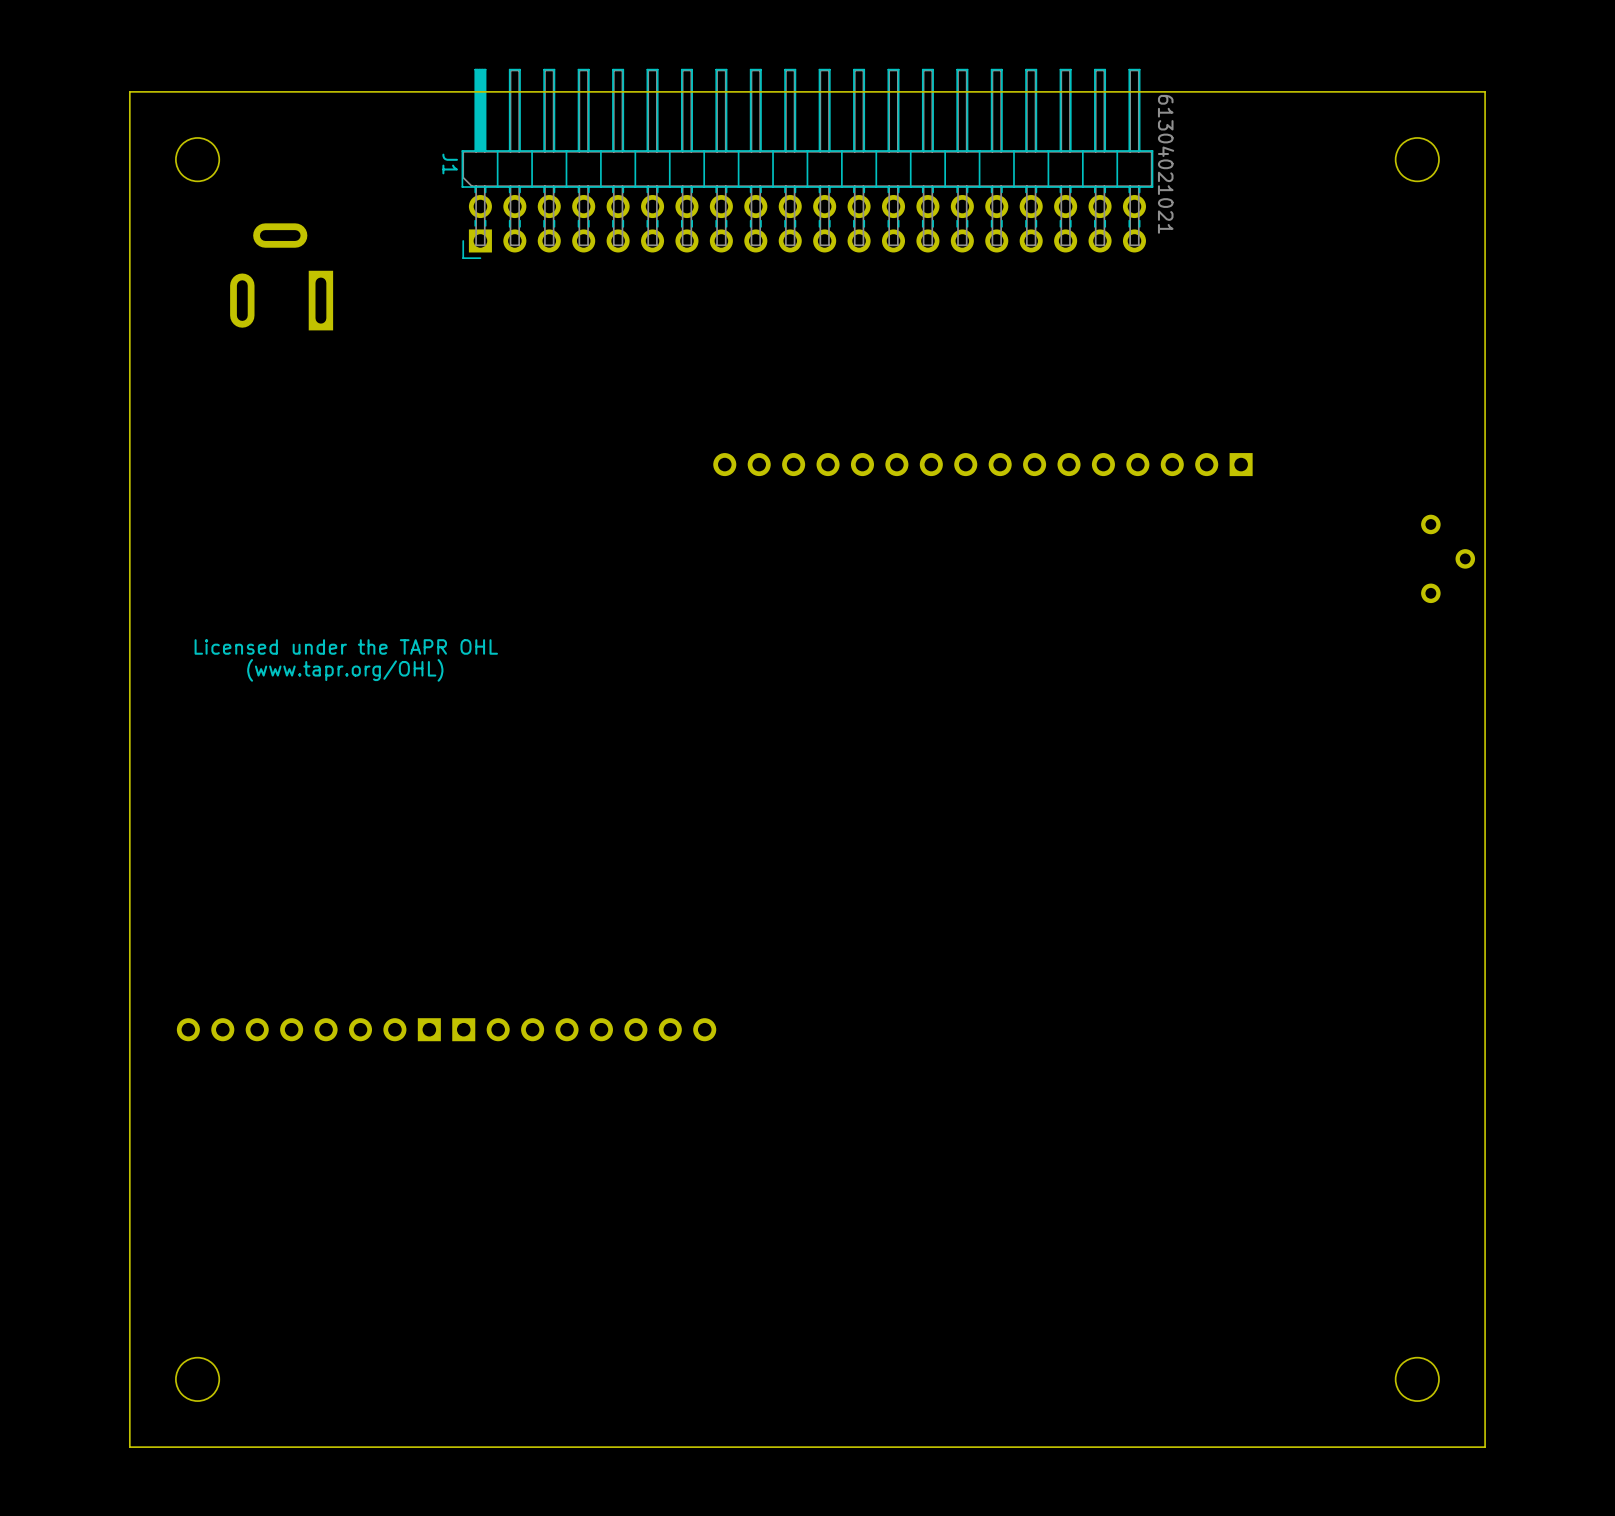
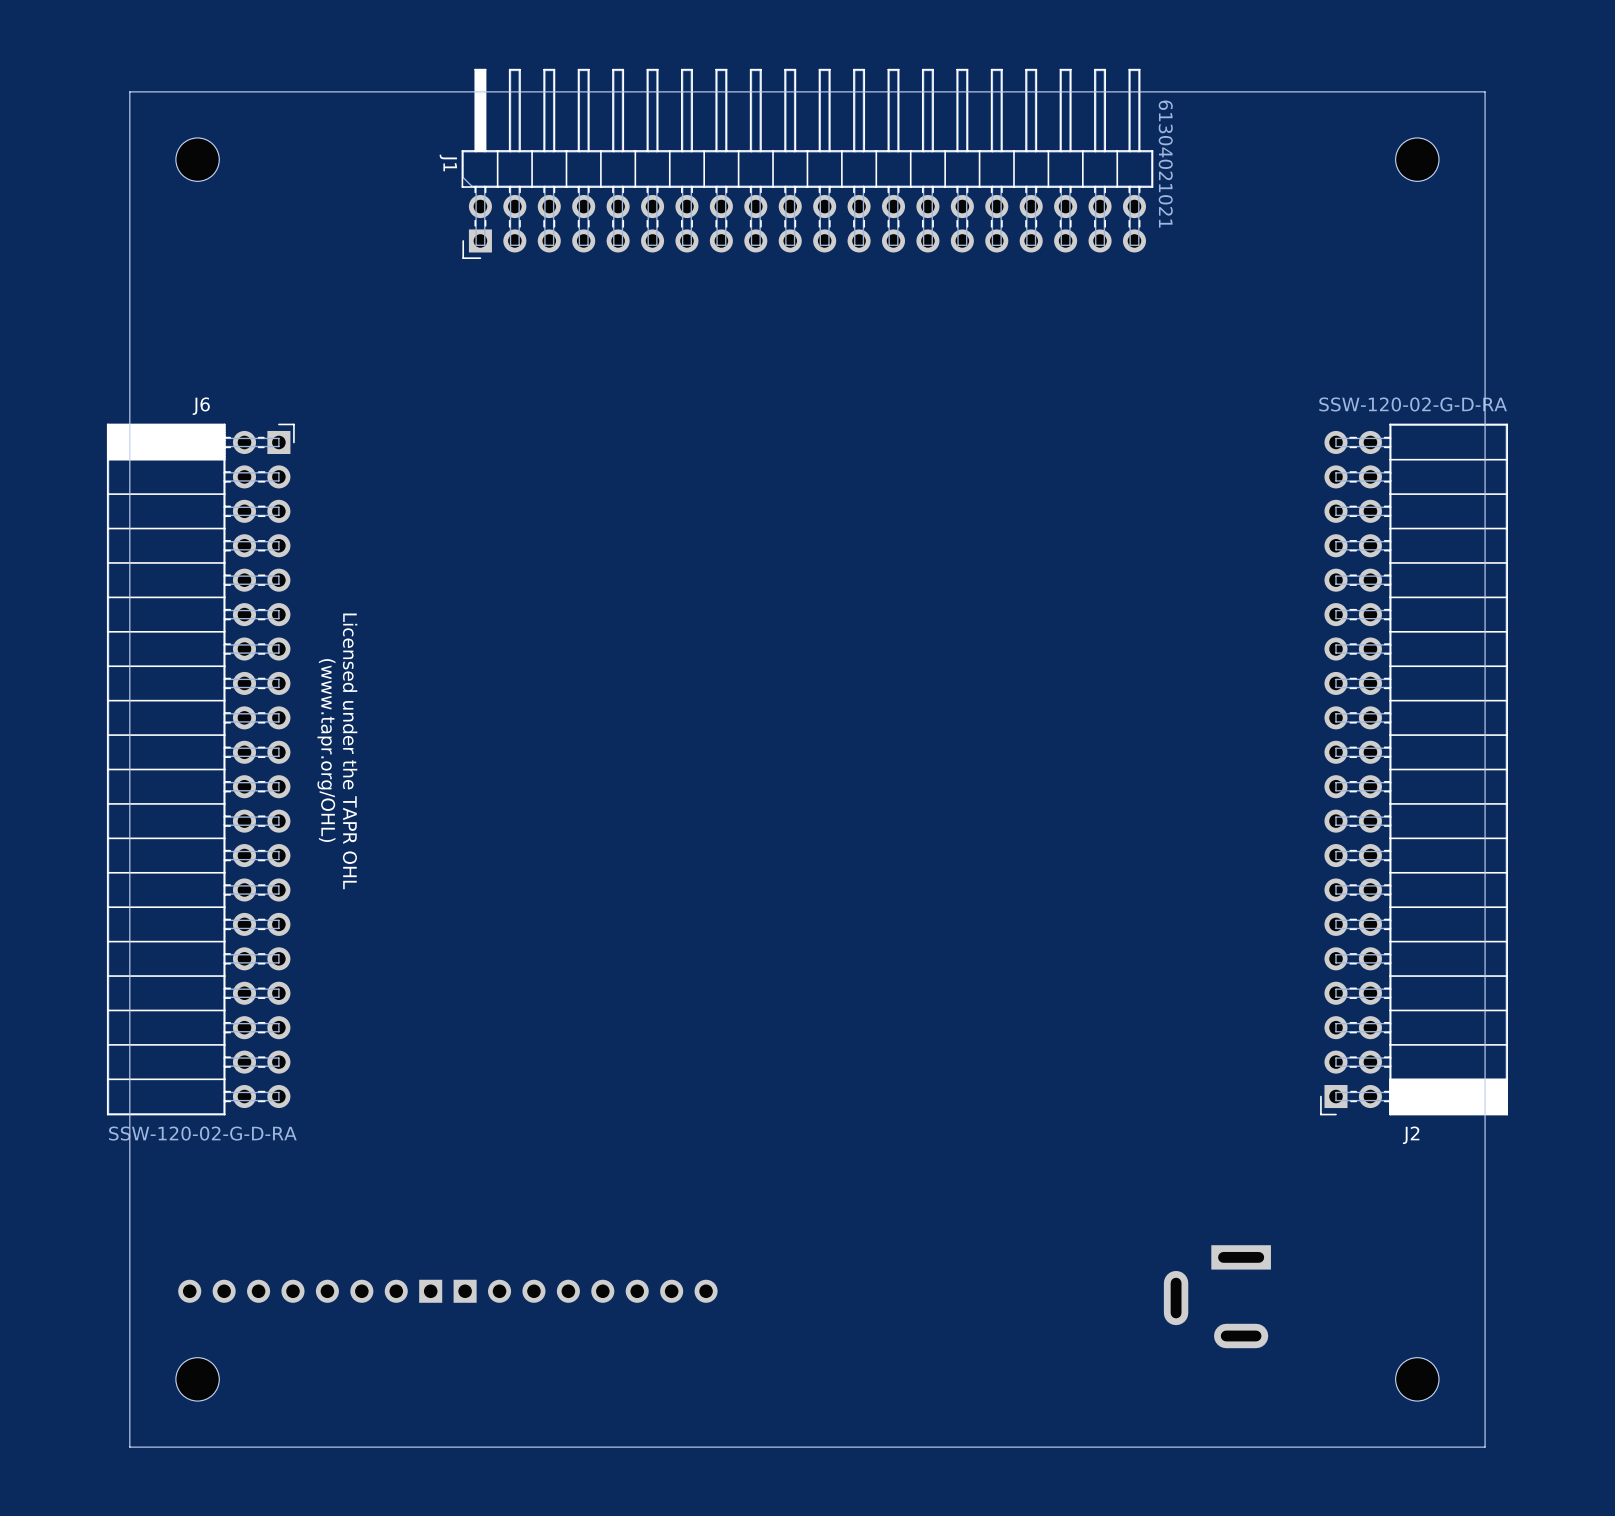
part: (281, 276) -> none
part: (982, 464) -> none
part: (1448, 558) -> none
text rotation: 0° (346, 646) -> 90° clockwise (350, 751)
text rotation: 0° (345, 670) -> 90° clockwise (326, 750)
J6: none -> SSW-120-02-G-D-RA (200, 769)
J2: none -> SSW-120-02-G-D-RA (1414, 769)
part: (308, 1029) -> none
part: (584, 1029) -> none
part: none -> (310, 1291)
part: none -> (585, 1291)
part: none -> (1217, 1296)

